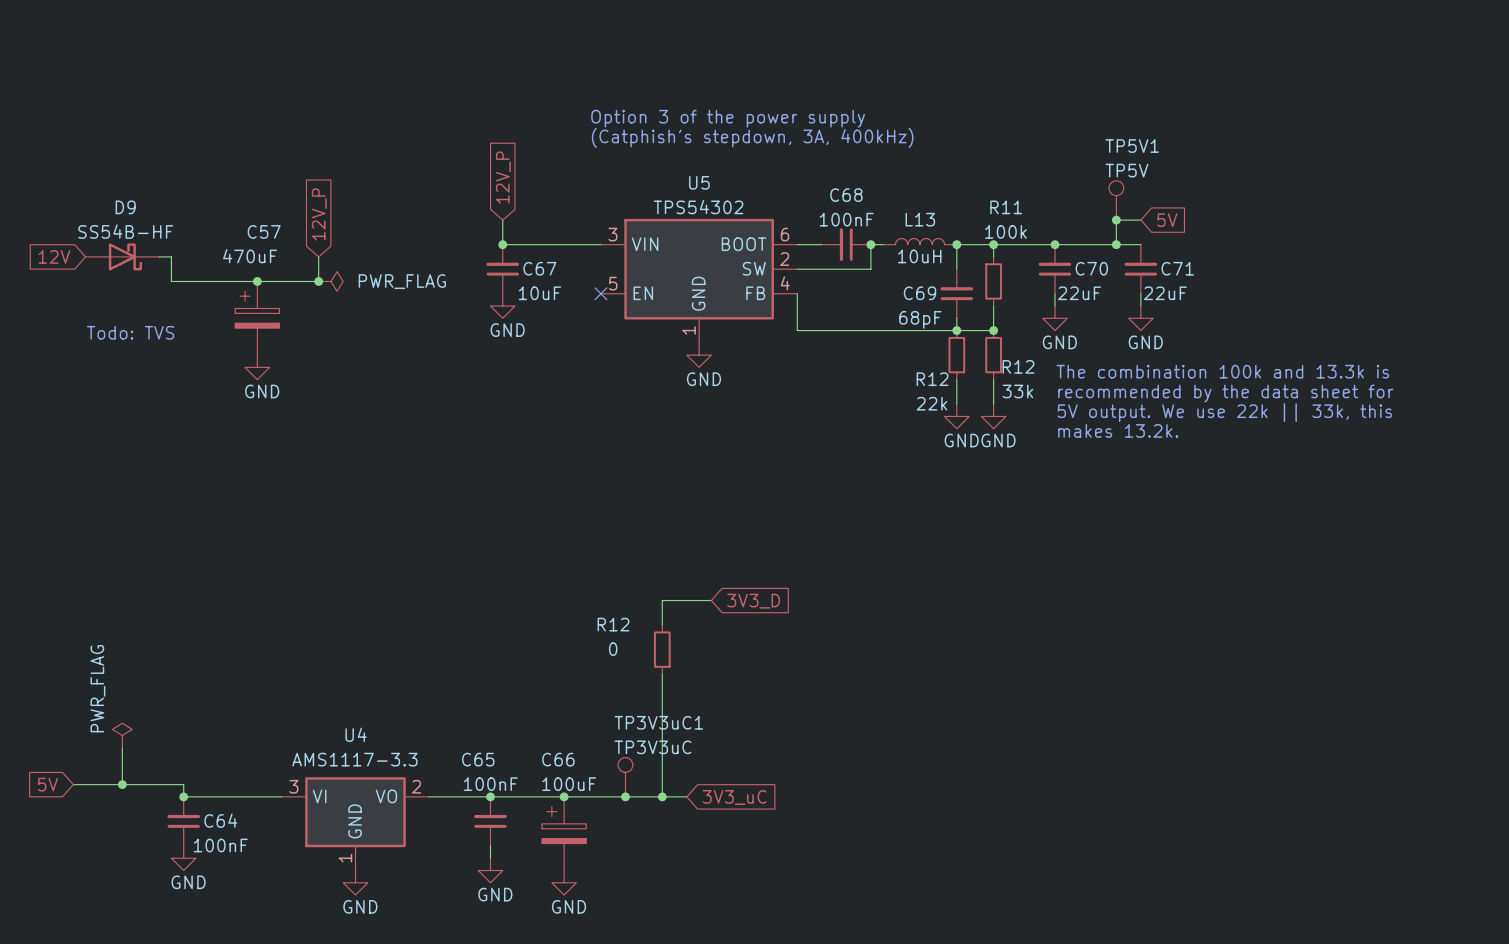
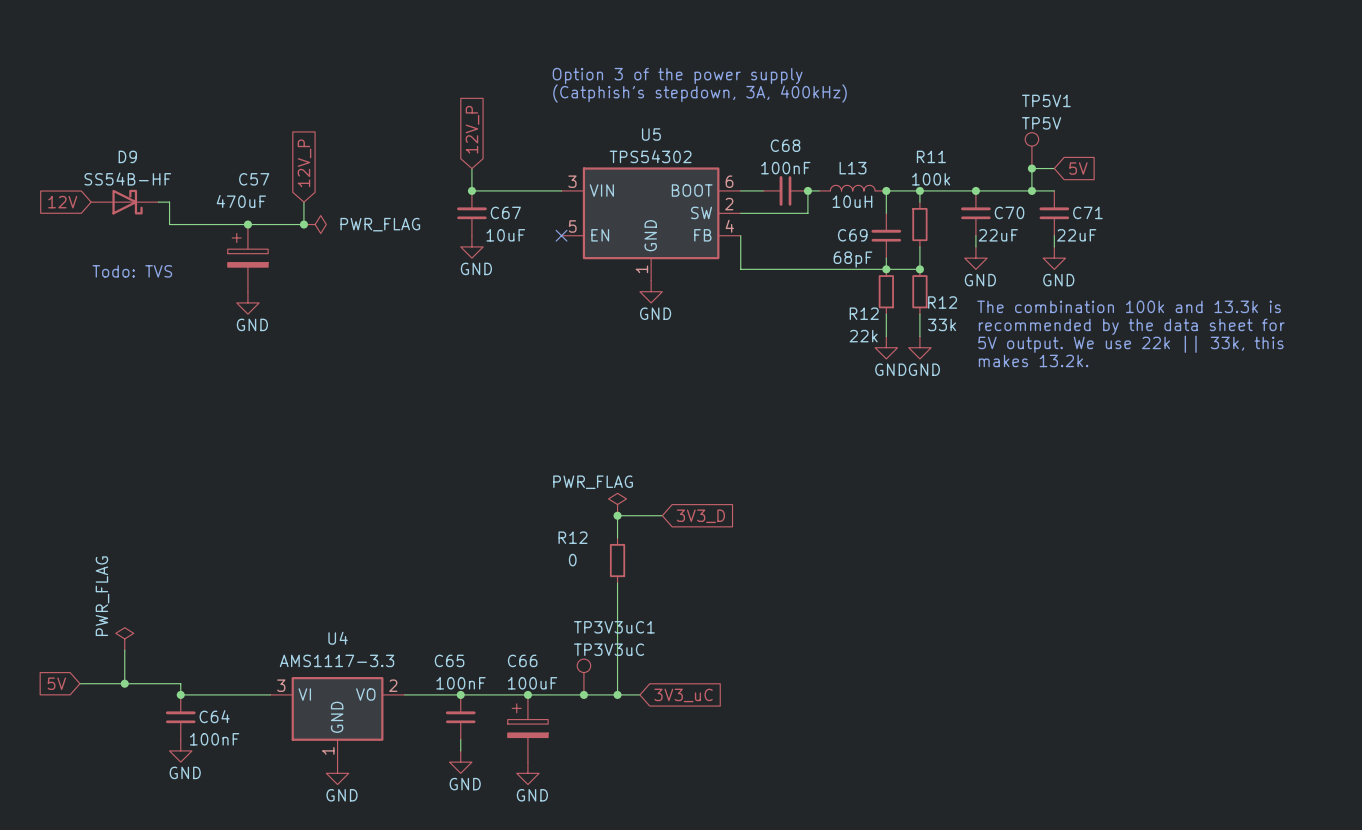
power symbol: none -> PWR_FLAG (617, 504)
junction: none -> (617, 515)

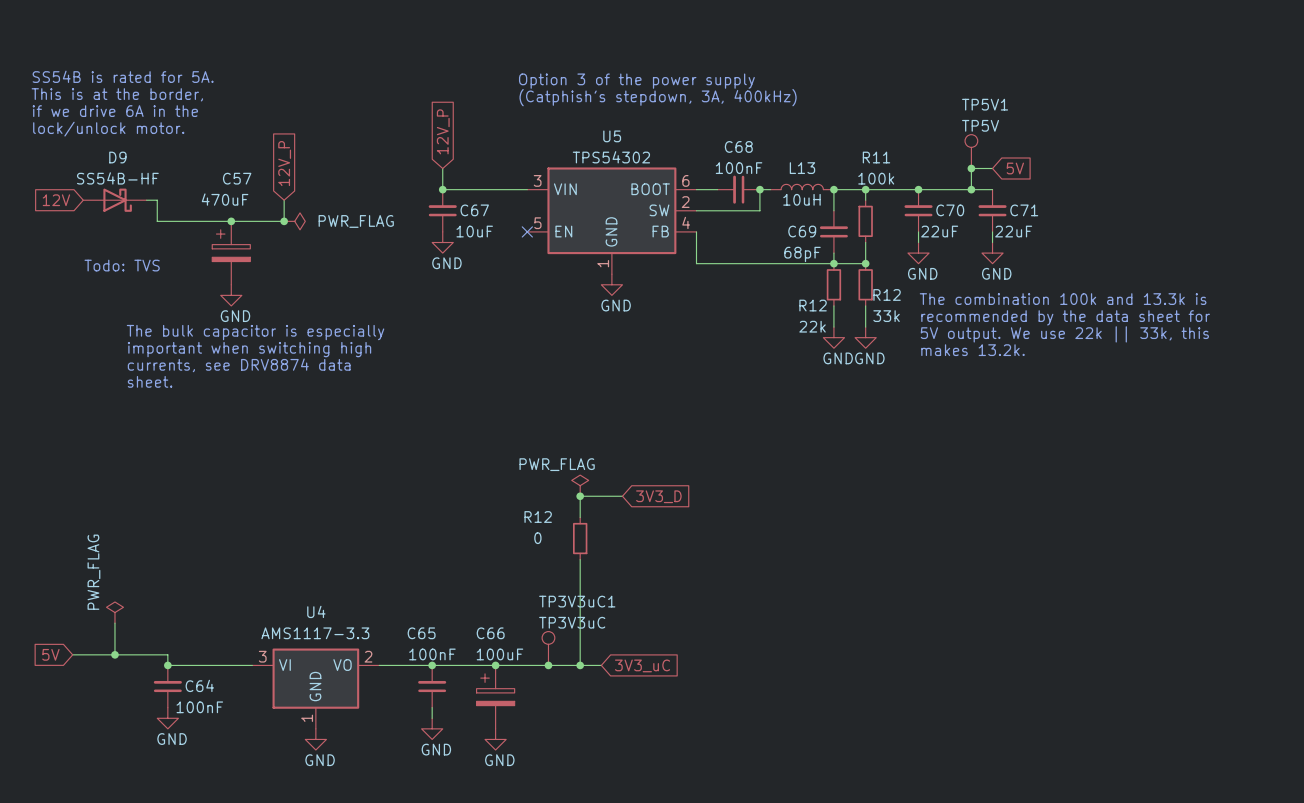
text: none -> SS54B is rated for 5A. (123, 76)
text: none -> This is at the border, (117, 94)
text: none -> if we drive 6A in the (115, 111)
text: none -> lock/unlock motor. (108, 129)
text: none -> The bulk capacitor is especially (255, 332)
text: none -> important when switching high (249, 349)
text: none -> currents, see DRV8874 data (239, 365)
text: none -> sheet. (150, 381)

